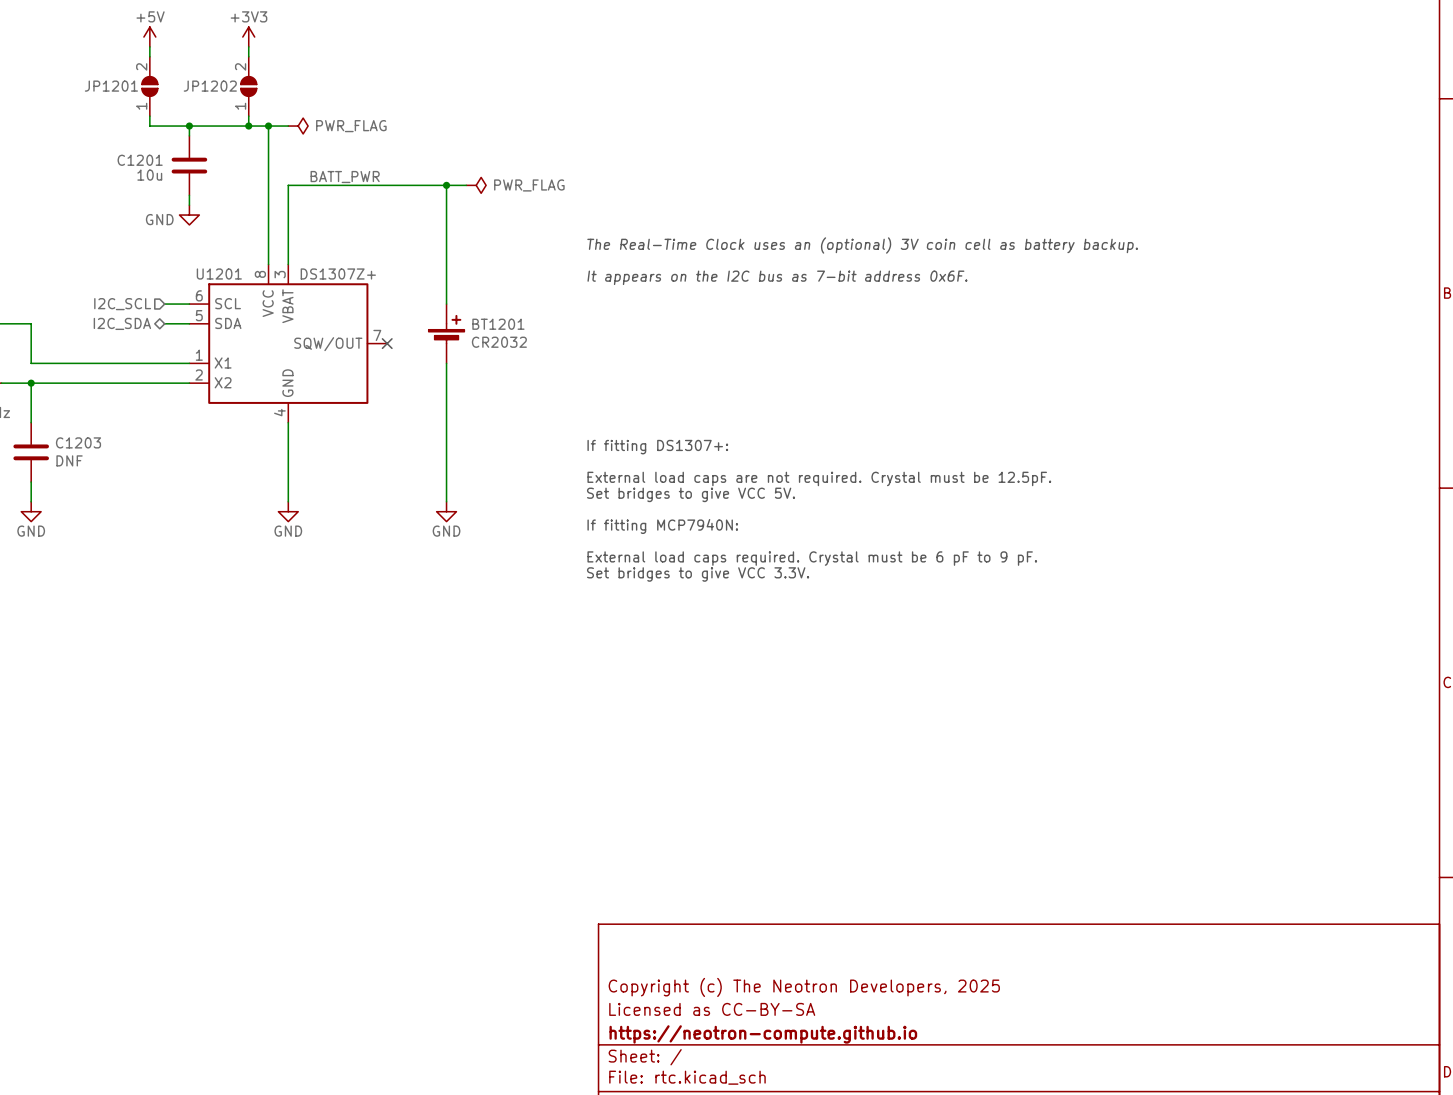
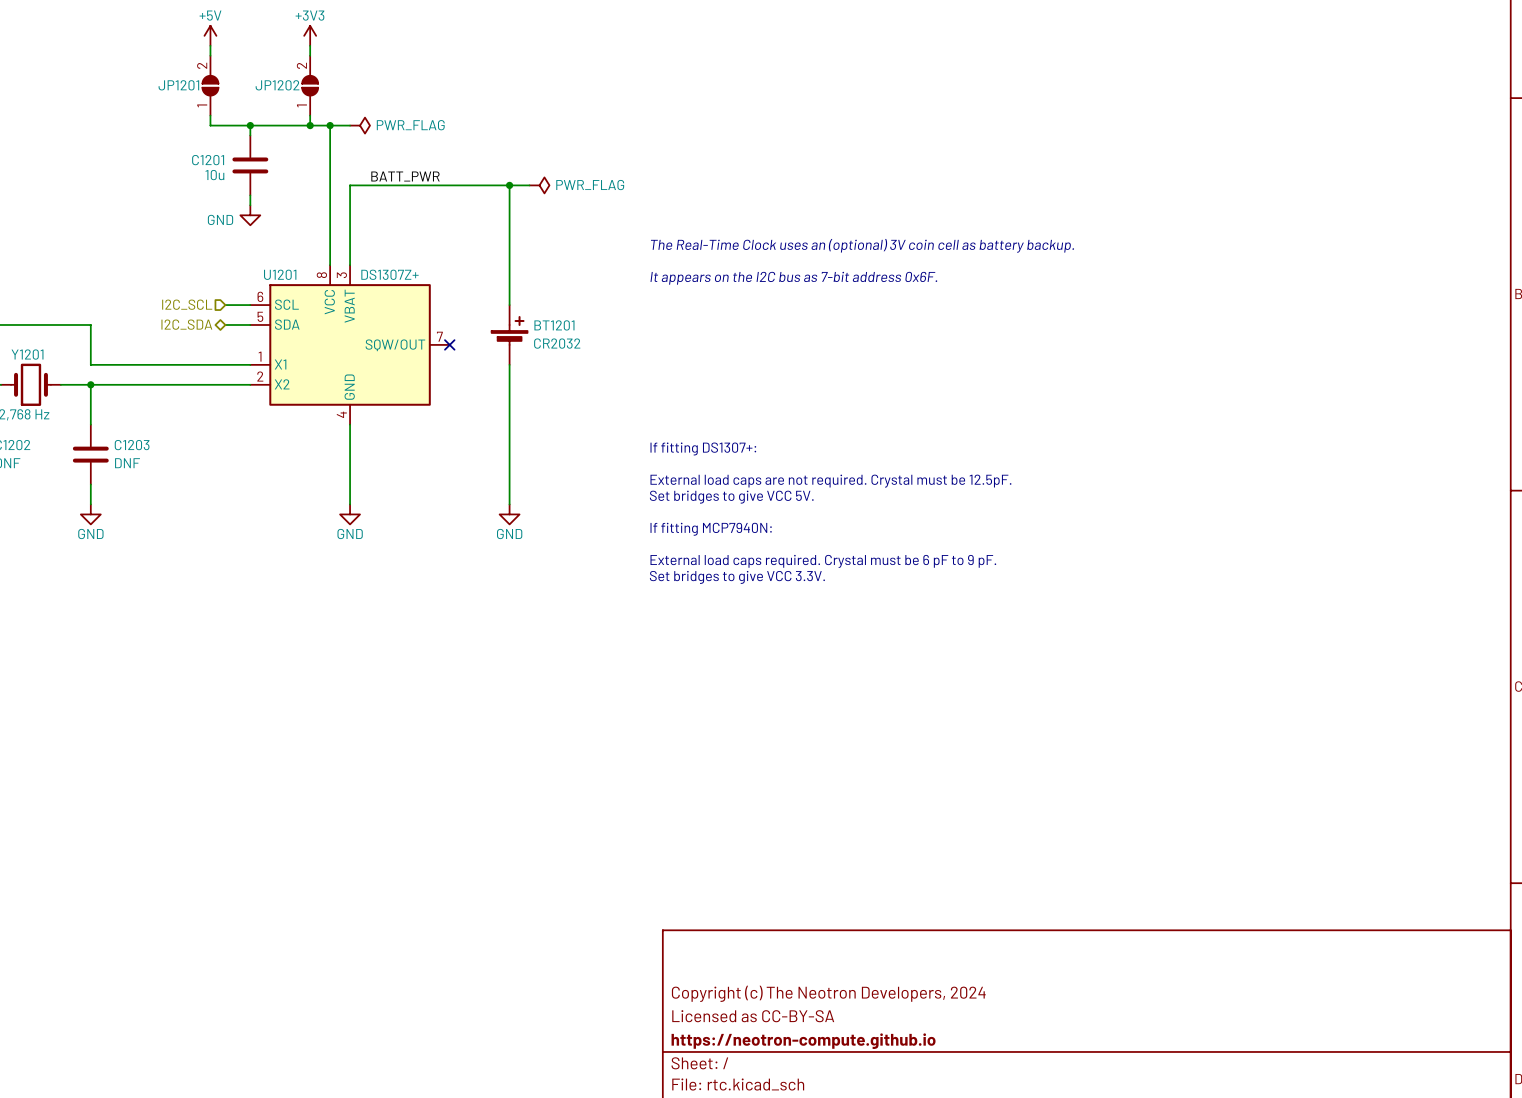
title block: Copyright (c) The Neotron Developers, 2025 (804, 987) -> Copyright (c) The Neotron Developers, 2024 (828, 993)

